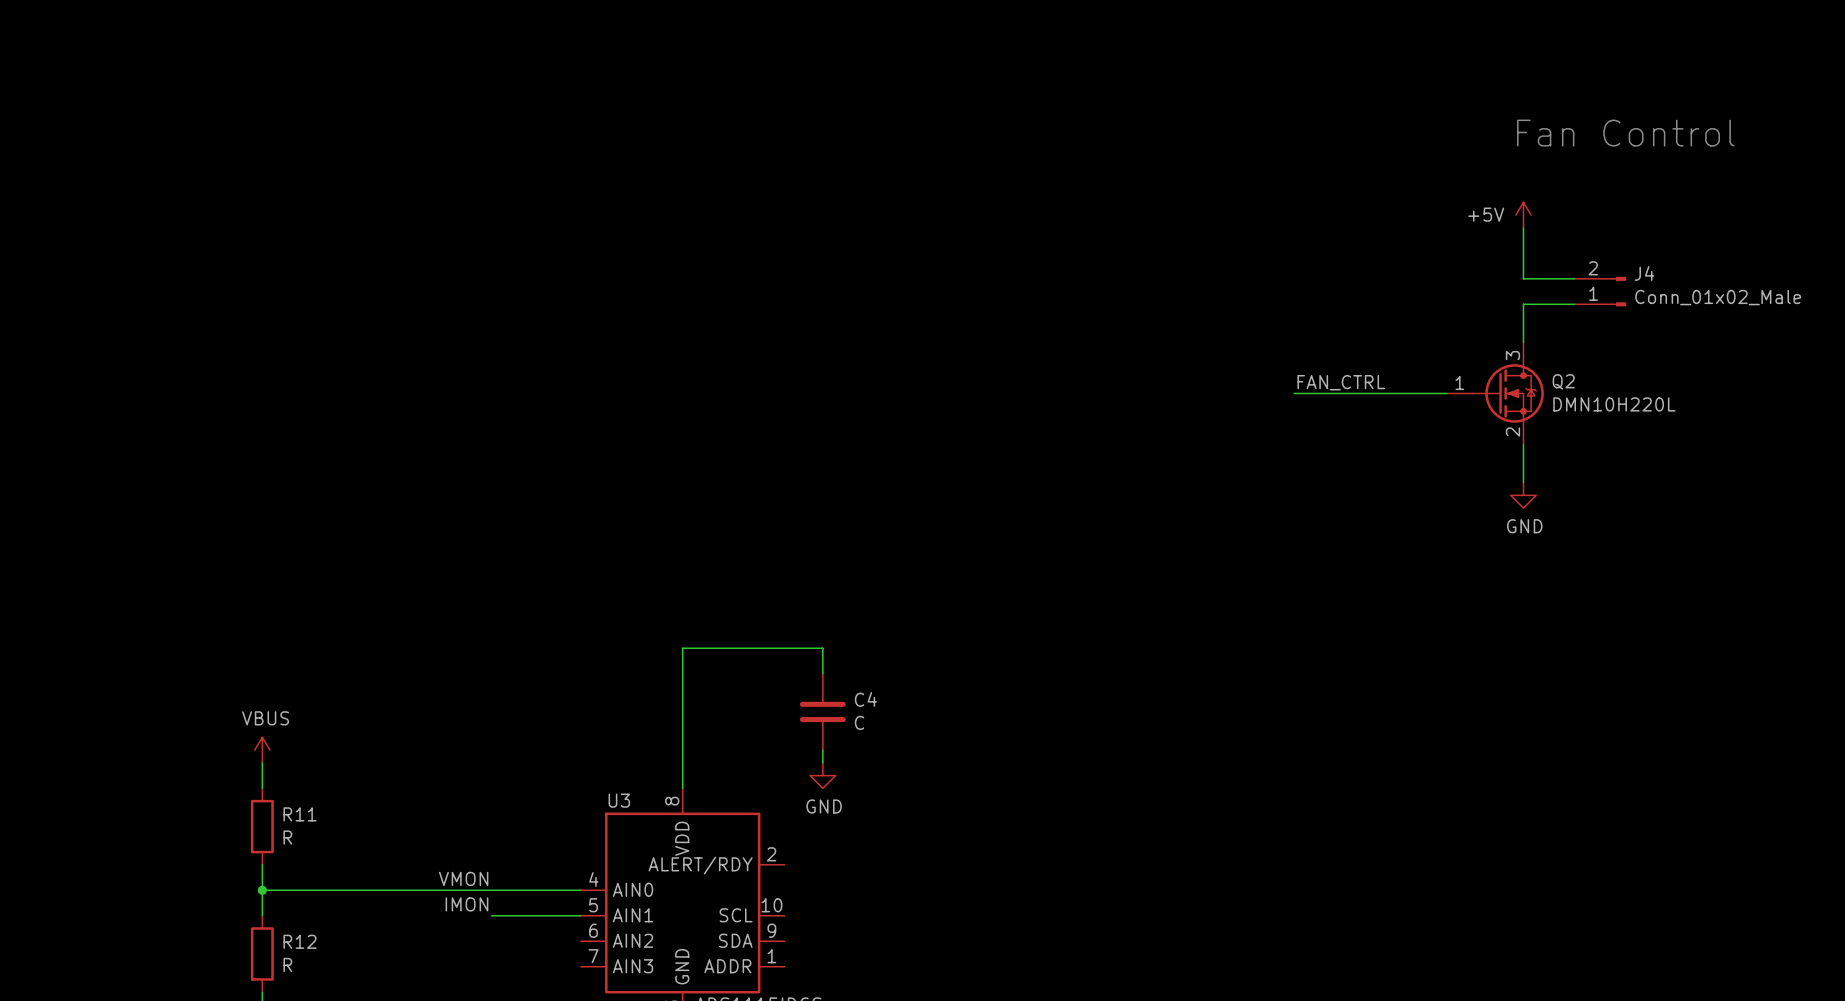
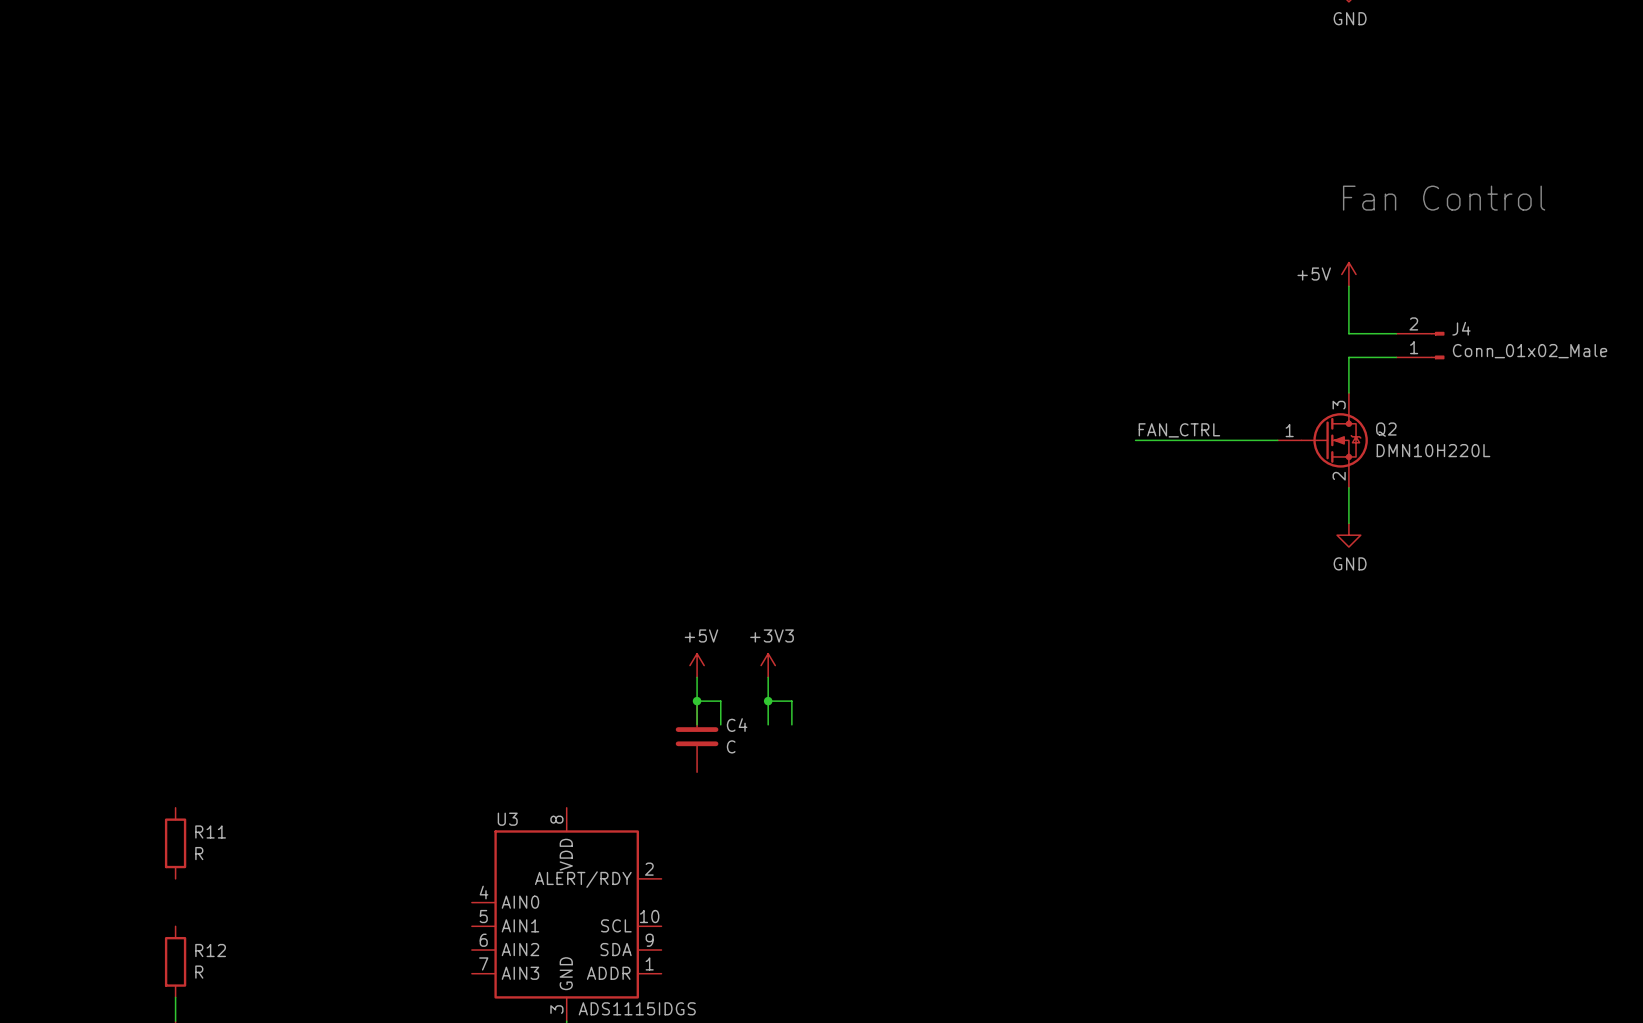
power symbol: none -> +5V (697, 665)
power symbol: none -> +3V3 (768, 665)
wire: (822, 648) (682, 648) (682, 788) -> none
wire: none -> (768, 677) (768, 724)
junction: none -> (697, 701)
wire: none -> (768, 701) (791, 701) (791, 724)
junction: none -> (768, 701)
wire: none -> (697, 724) (697, 701) (720, 701) (720, 724)
power symbol: VBUS (262, 750) -> none
wire: (822, 750) (822, 762) -> none
wire: (262, 762) (262, 788) -> none
power symbol: GND (822, 775) -> none
wire: (262, 864) (262, 915) -> none
label: VMON (463, 878) -> none
wire: (262, 890) (580, 890) -> none
junction: (262, 890) -> none
label: IMON (466, 904) -> none
wire: (491, 915) (580, 915) -> none

